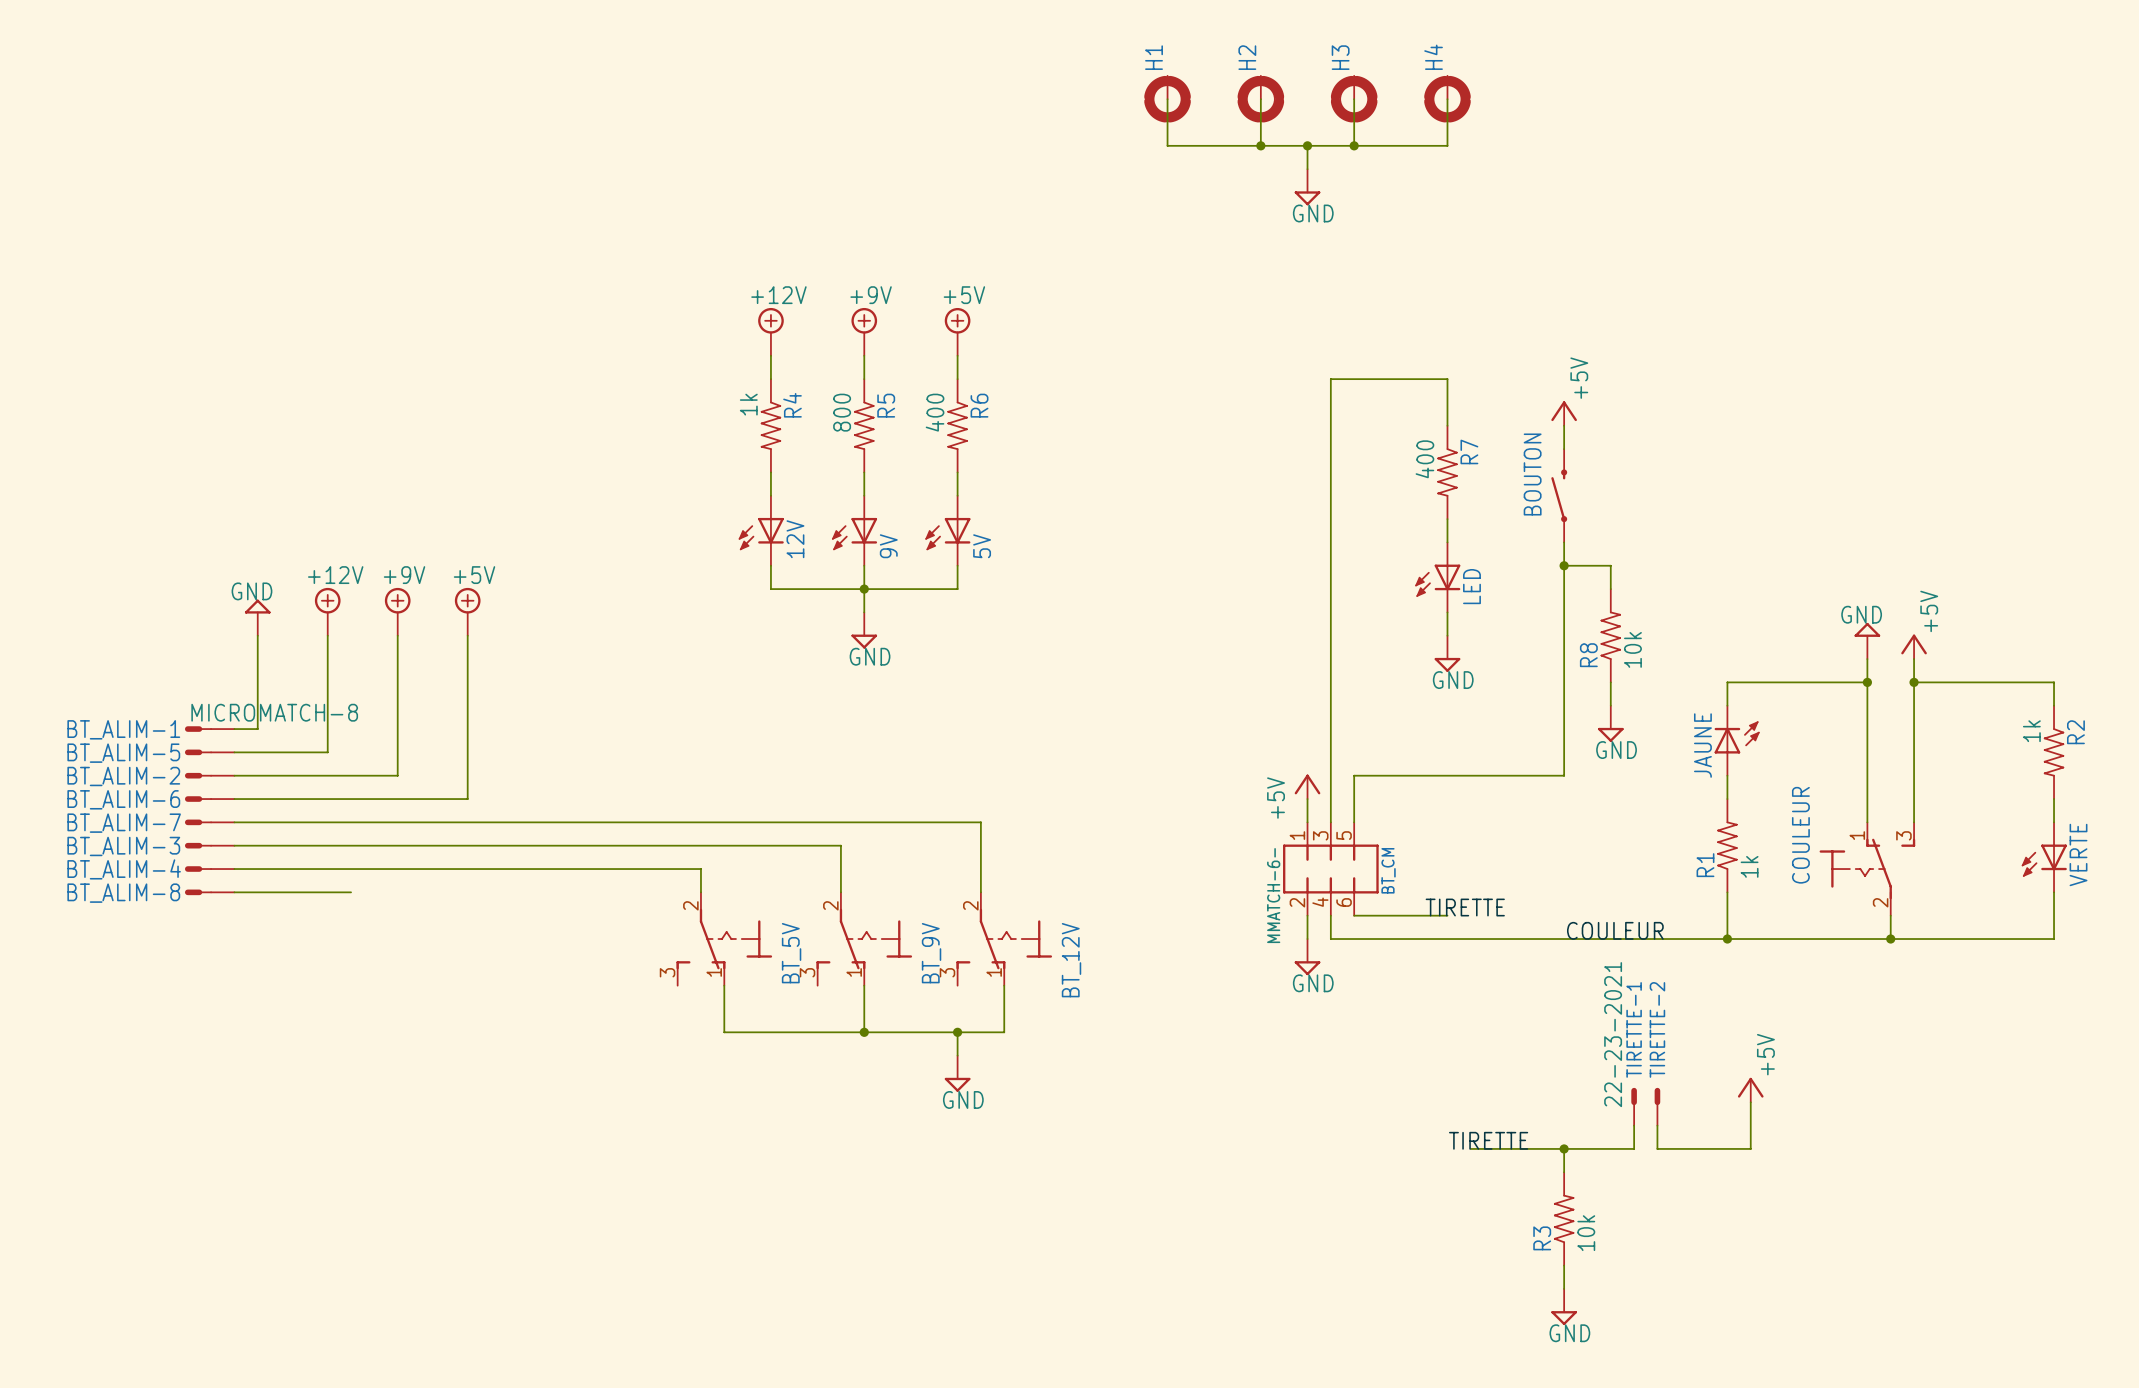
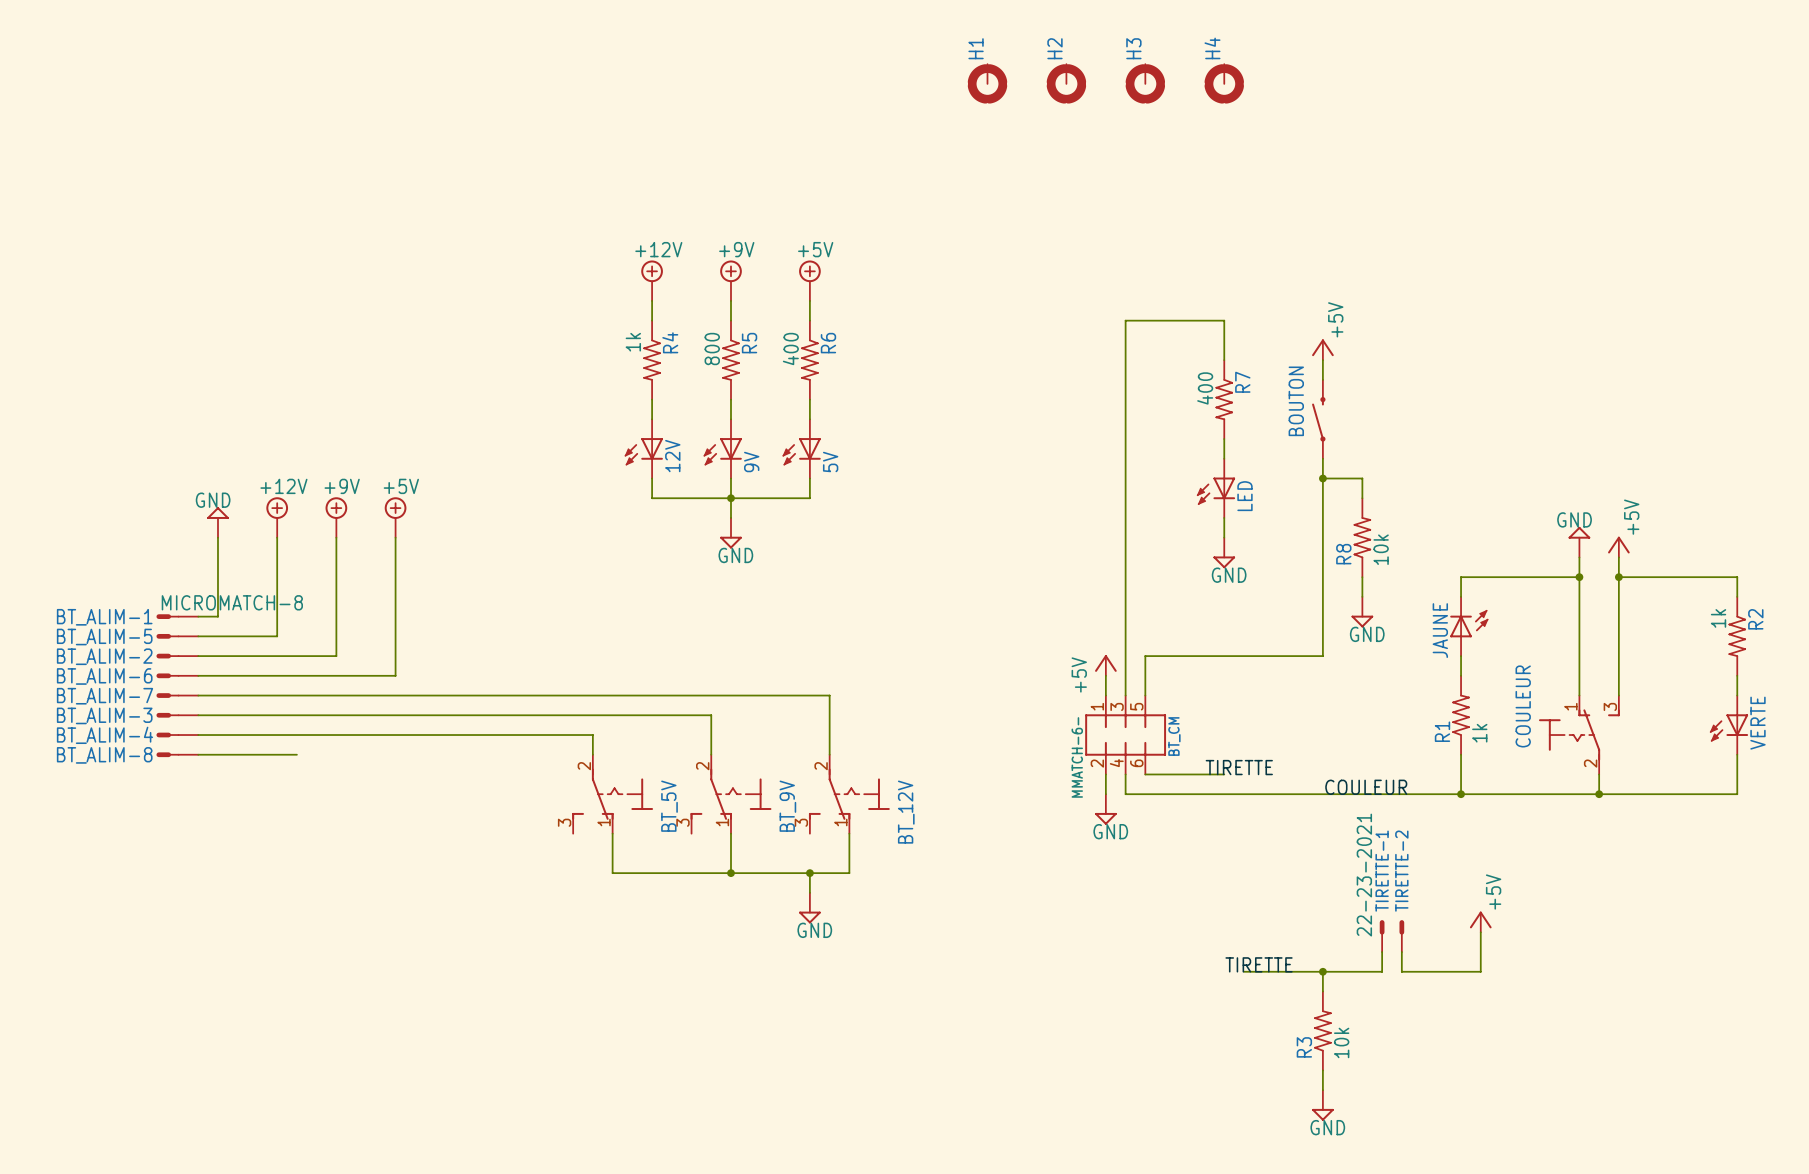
wire: (1167, 99) (1167, 145) (1447, 145) (1447, 99) -> none
wire: (1260, 99) (1260, 145) -> none
wire: (1354, 99) (1354, 145) -> none
junction: (1260, 145) -> none
wire: (1307, 145) (1307, 169) -> none
junction: (1307, 145) -> none
junction: (1354, 145) -> none
power symbol: GND (1307, 187) -> none

